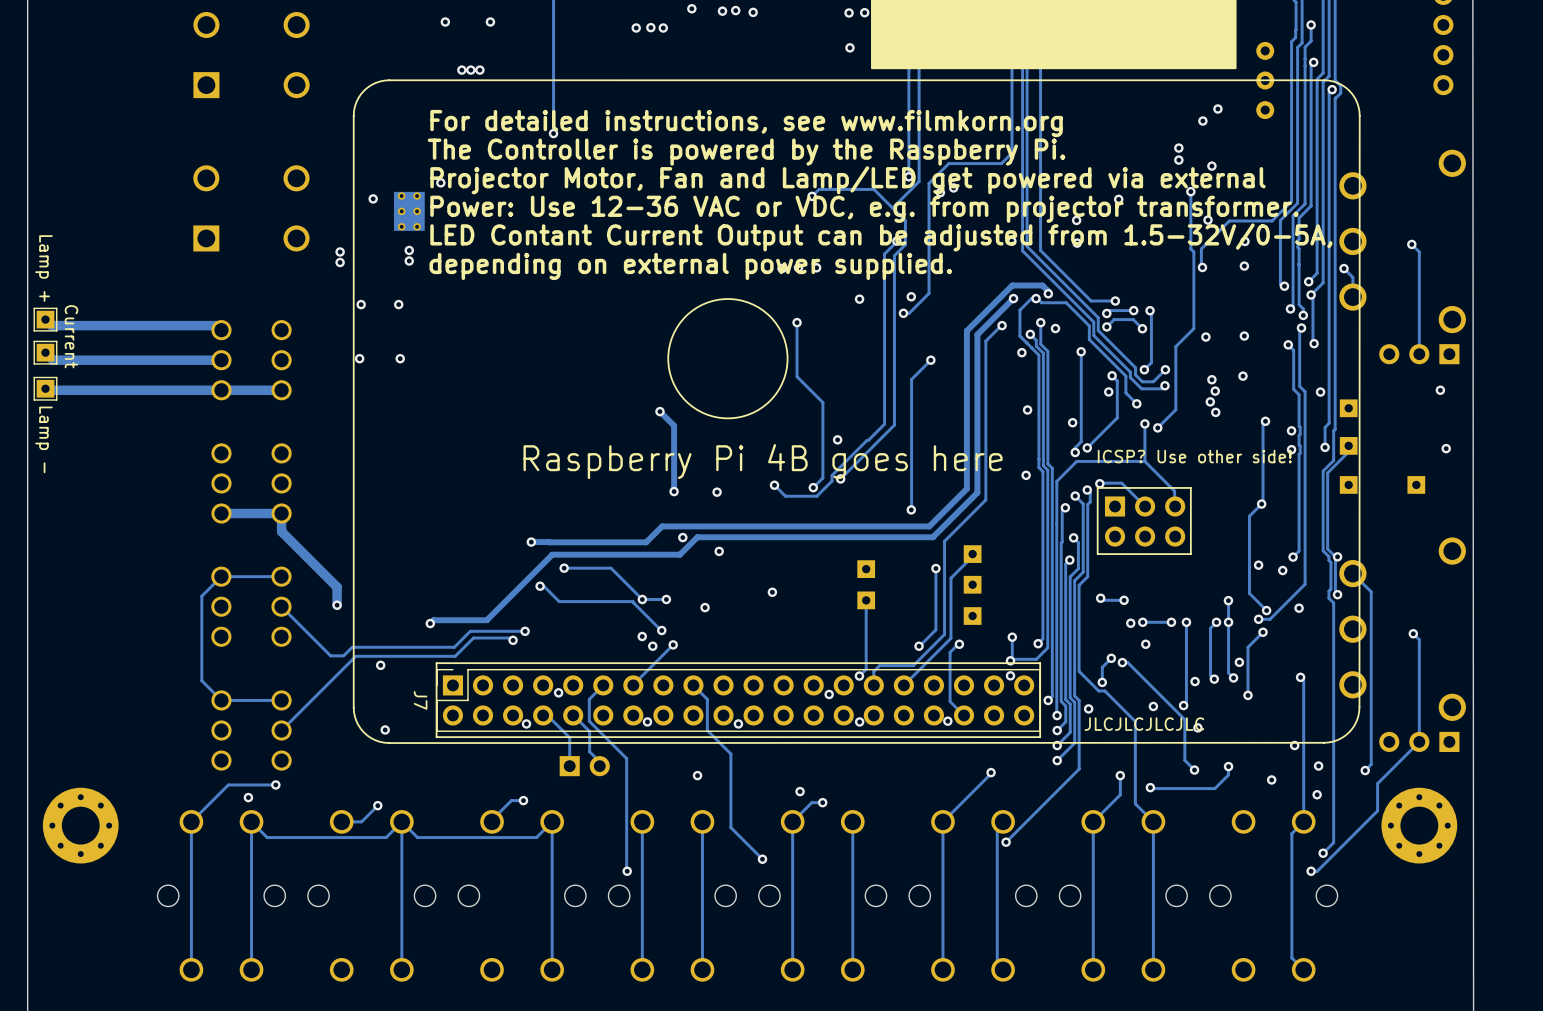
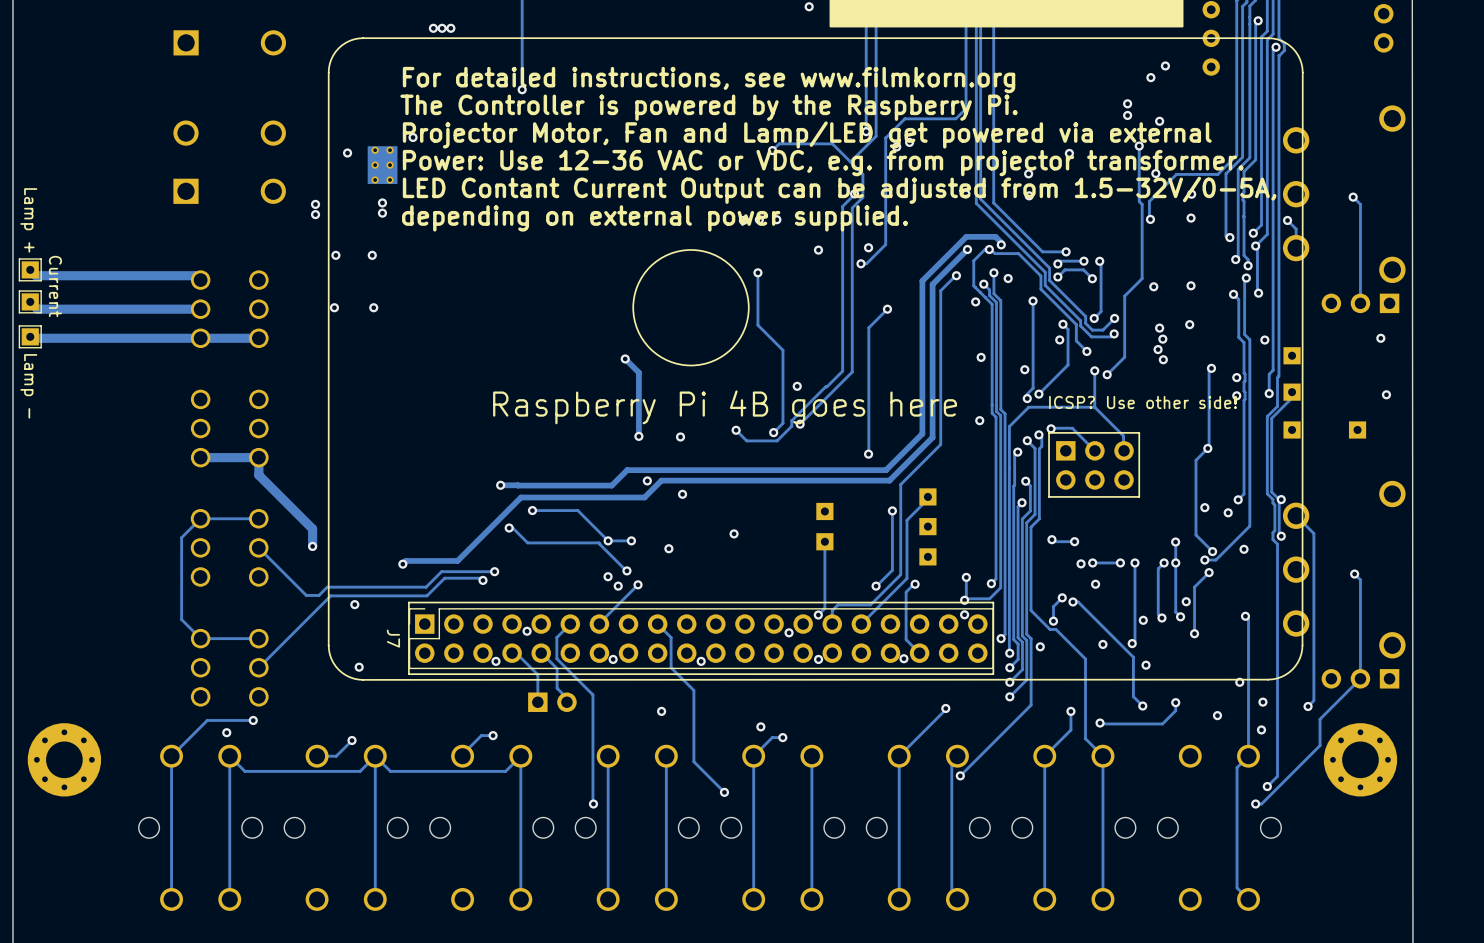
text: JLCJLCJLCJLC (1144, 724) -> none

